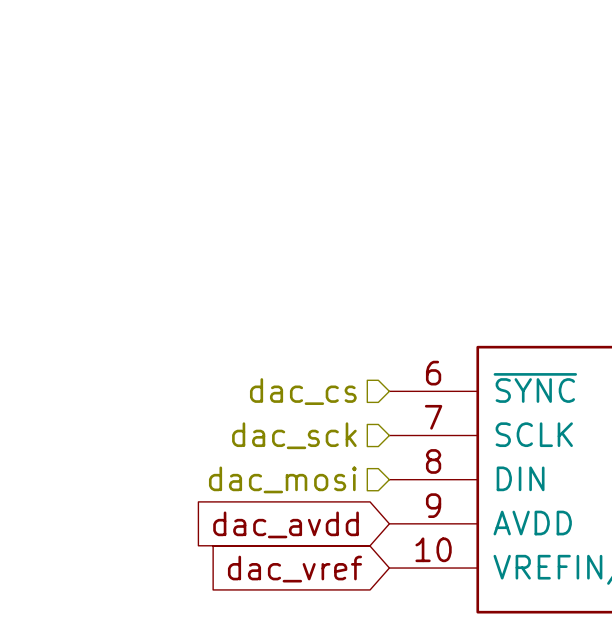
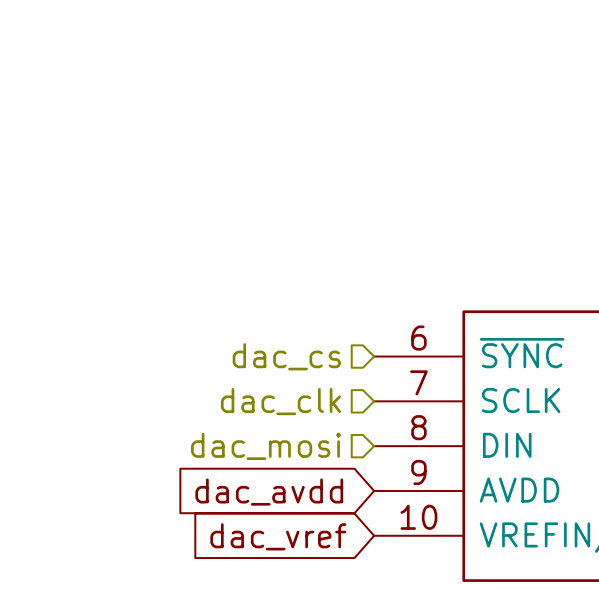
hierarchical label: dac_sck (294, 435) -> dac_clk (280, 401)

